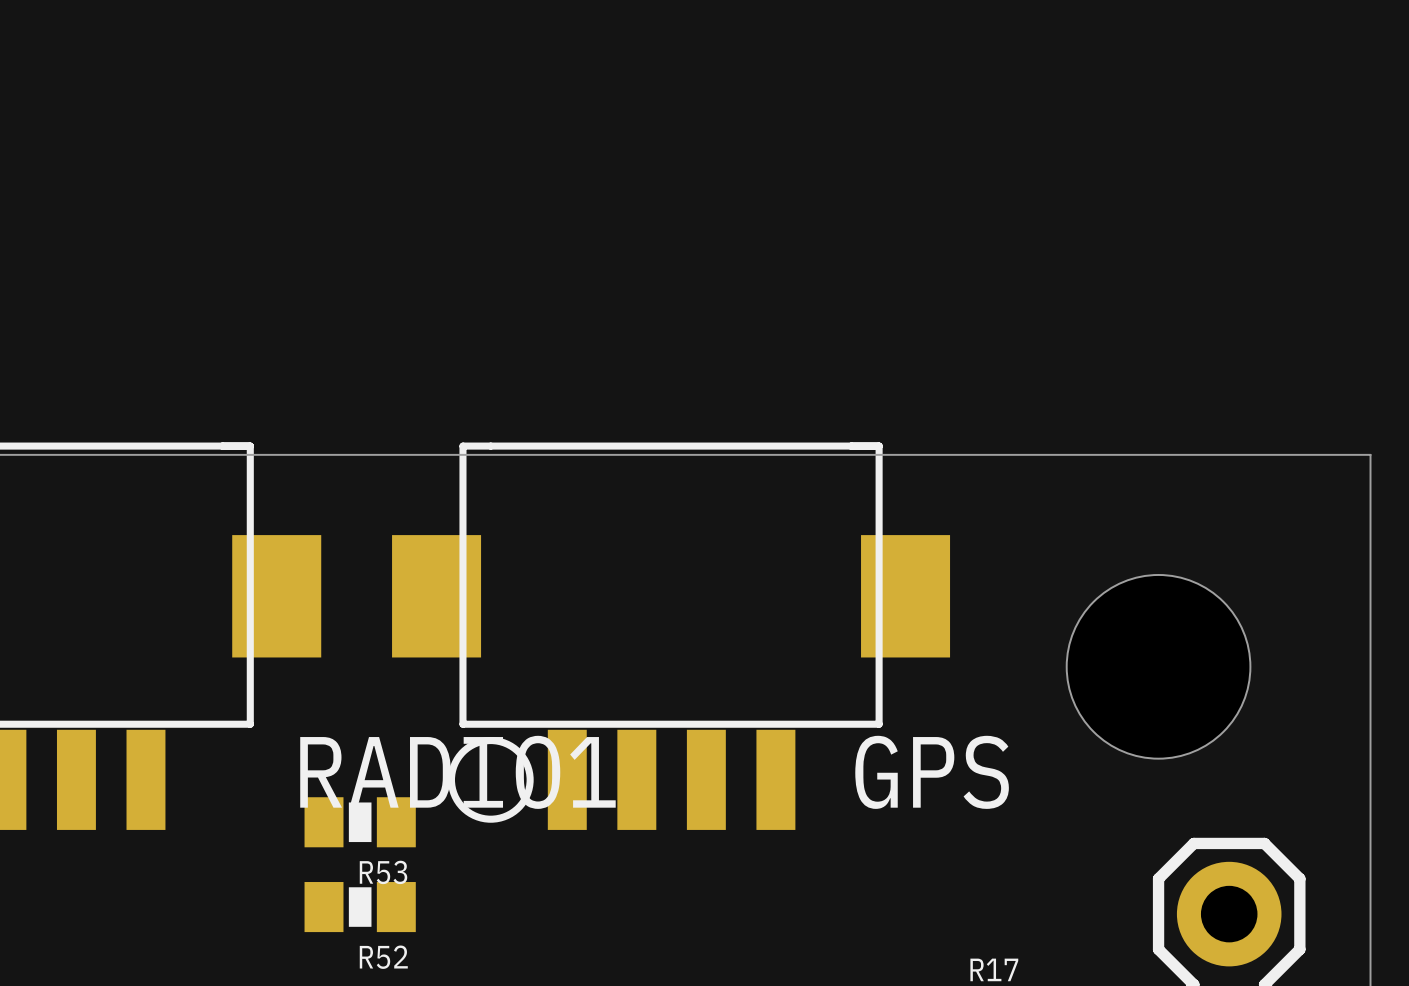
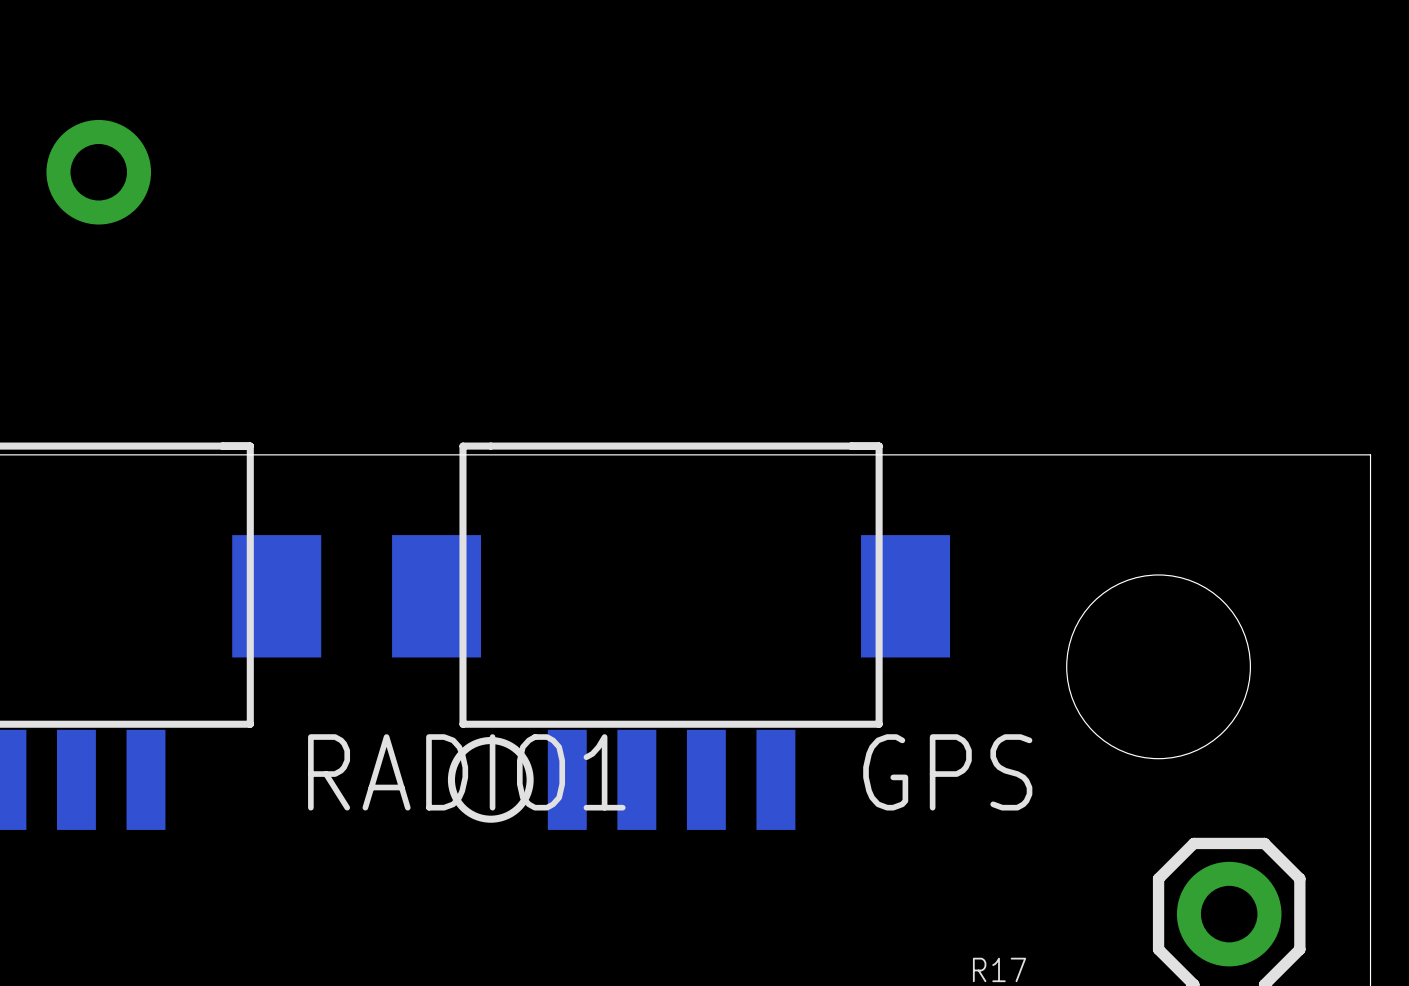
part: none -> (98, 172)
R53: (360, 822) -> none
R52: (360, 907) -> none

